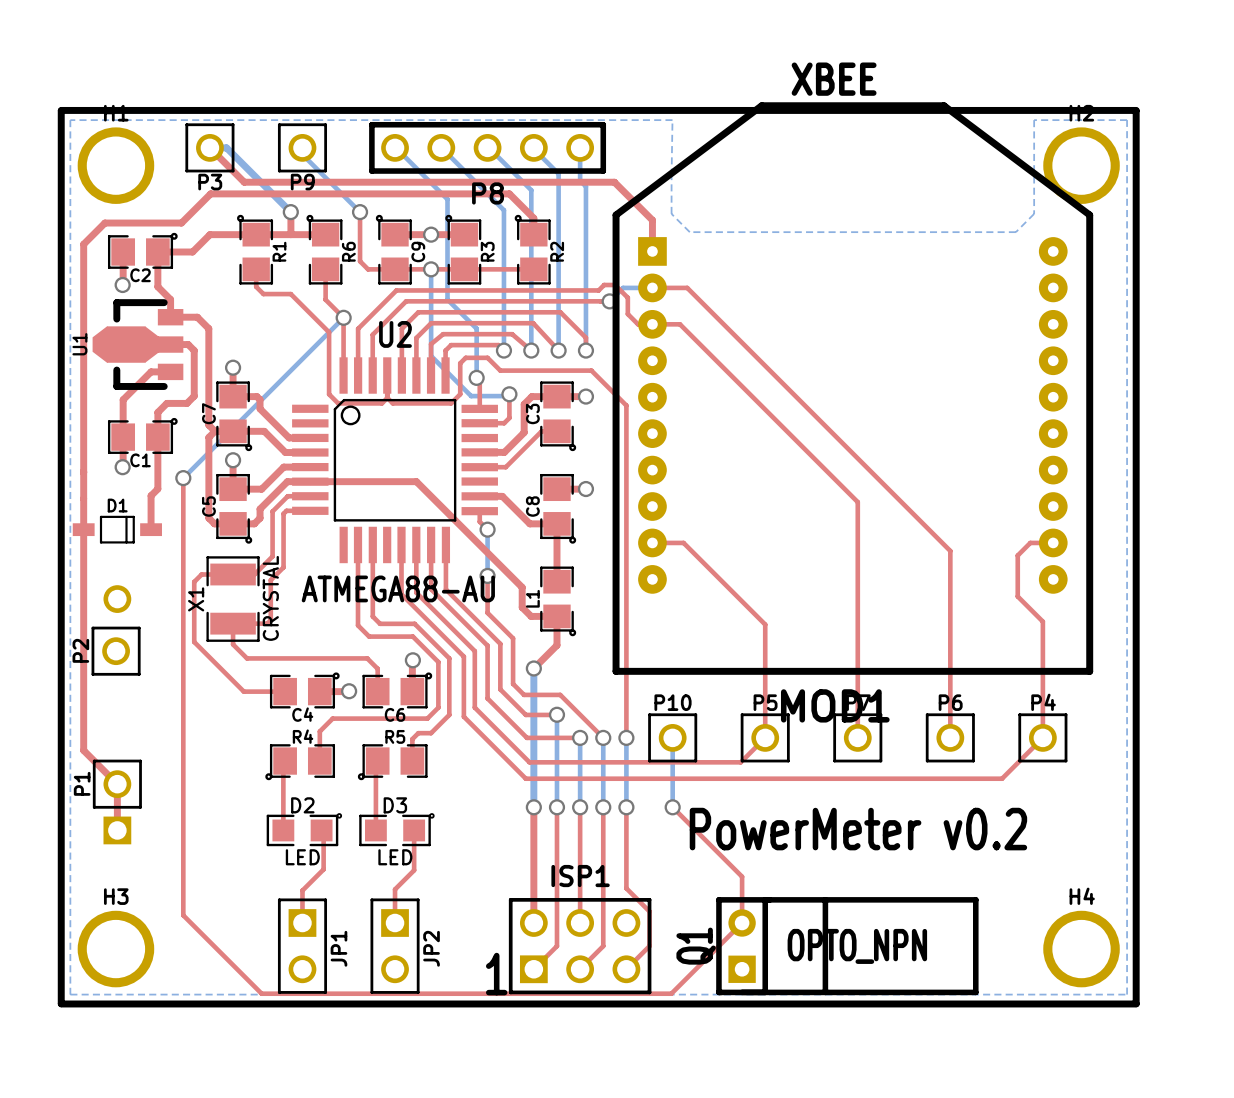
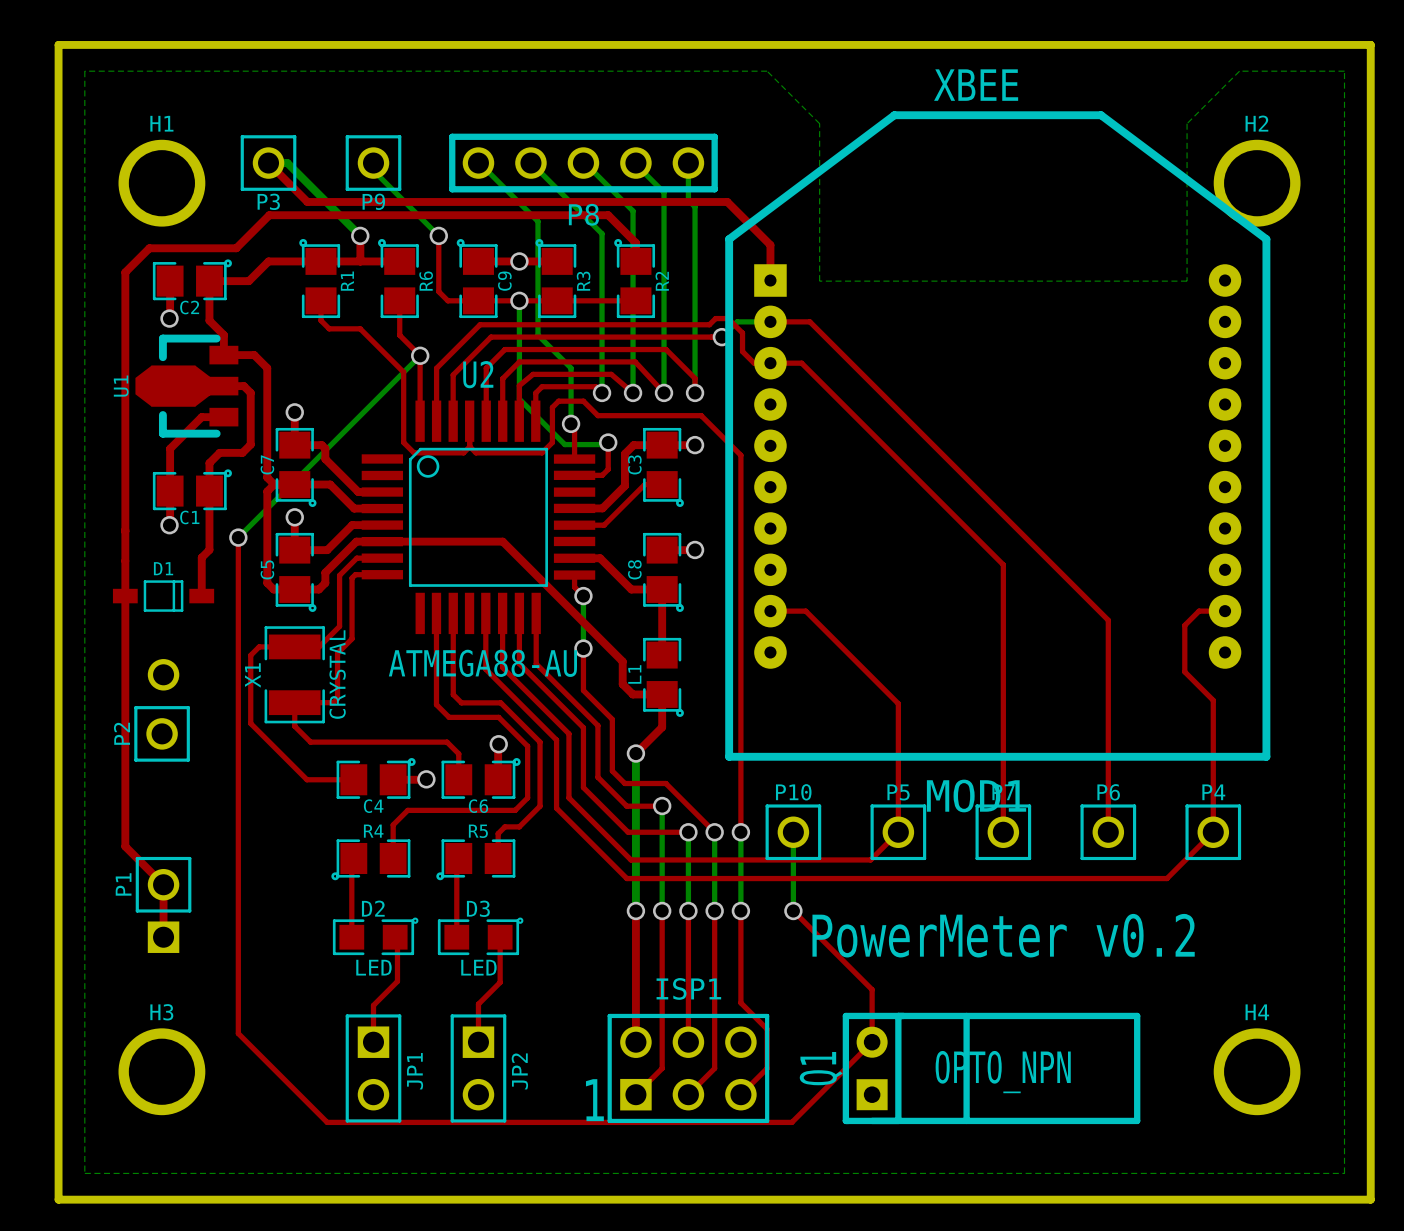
board edge: none -> (58, 44) (58, 1199) (1370, 1199) (1370, 44) (58, 44)
board edge: (61, 110) (1136, 110) -> none
board edge: (61, 111) (61, 1003) -> none
board edge: (1136, 111) (1136, 1003) -> none
bottom zone outline: (70, 120) (672, 120) (671, 213) (689, 232) (1015, 232) (1034, 213) (1034, 120) (1127, 120) (1127, 994) (70, 994) (70, 120) -> (84, 71) (84, 1173) (1344, 1173) (1344, 71) (1239, 71) (1187, 123) (1187, 281) (819, 281) (819, 123) (767, 71) (84, 71)
board edge: (61, 1003) (1136, 1003) -> none

